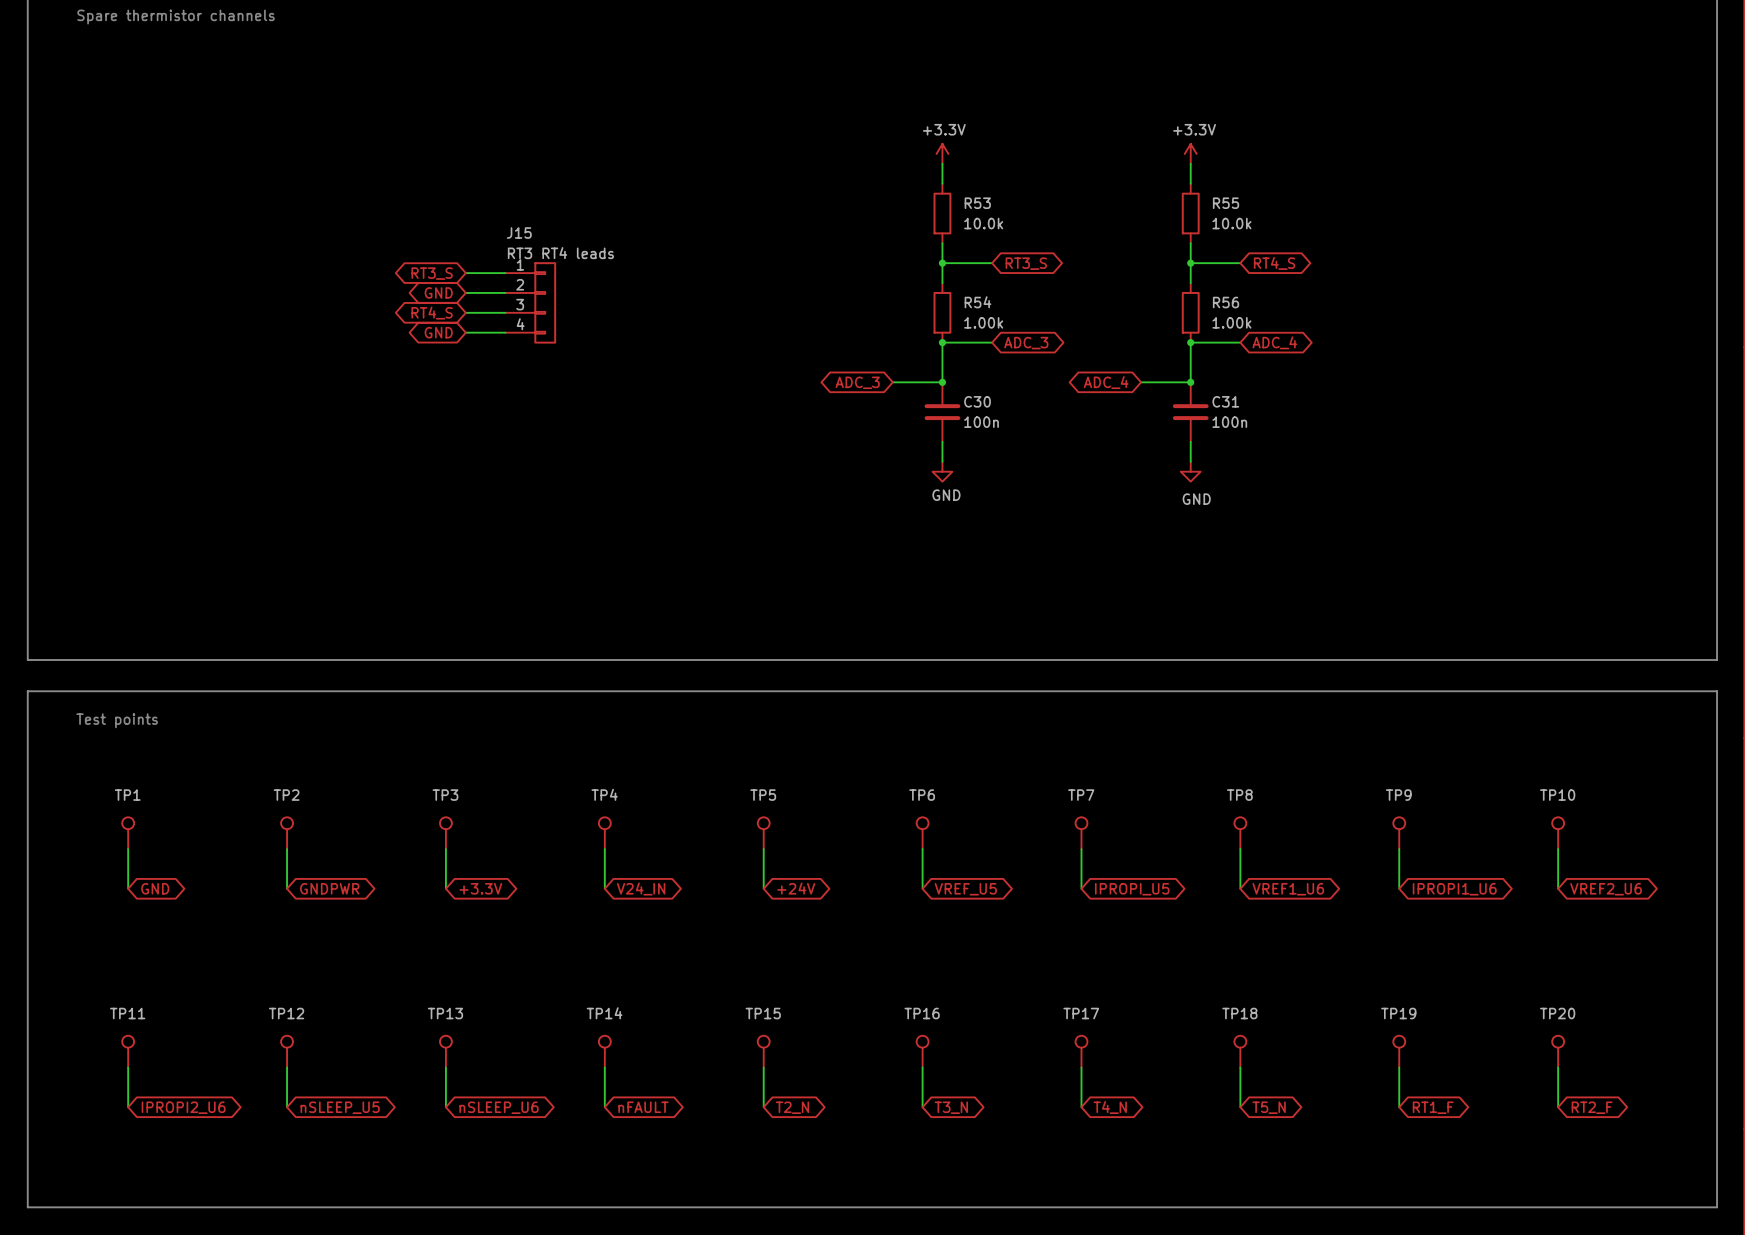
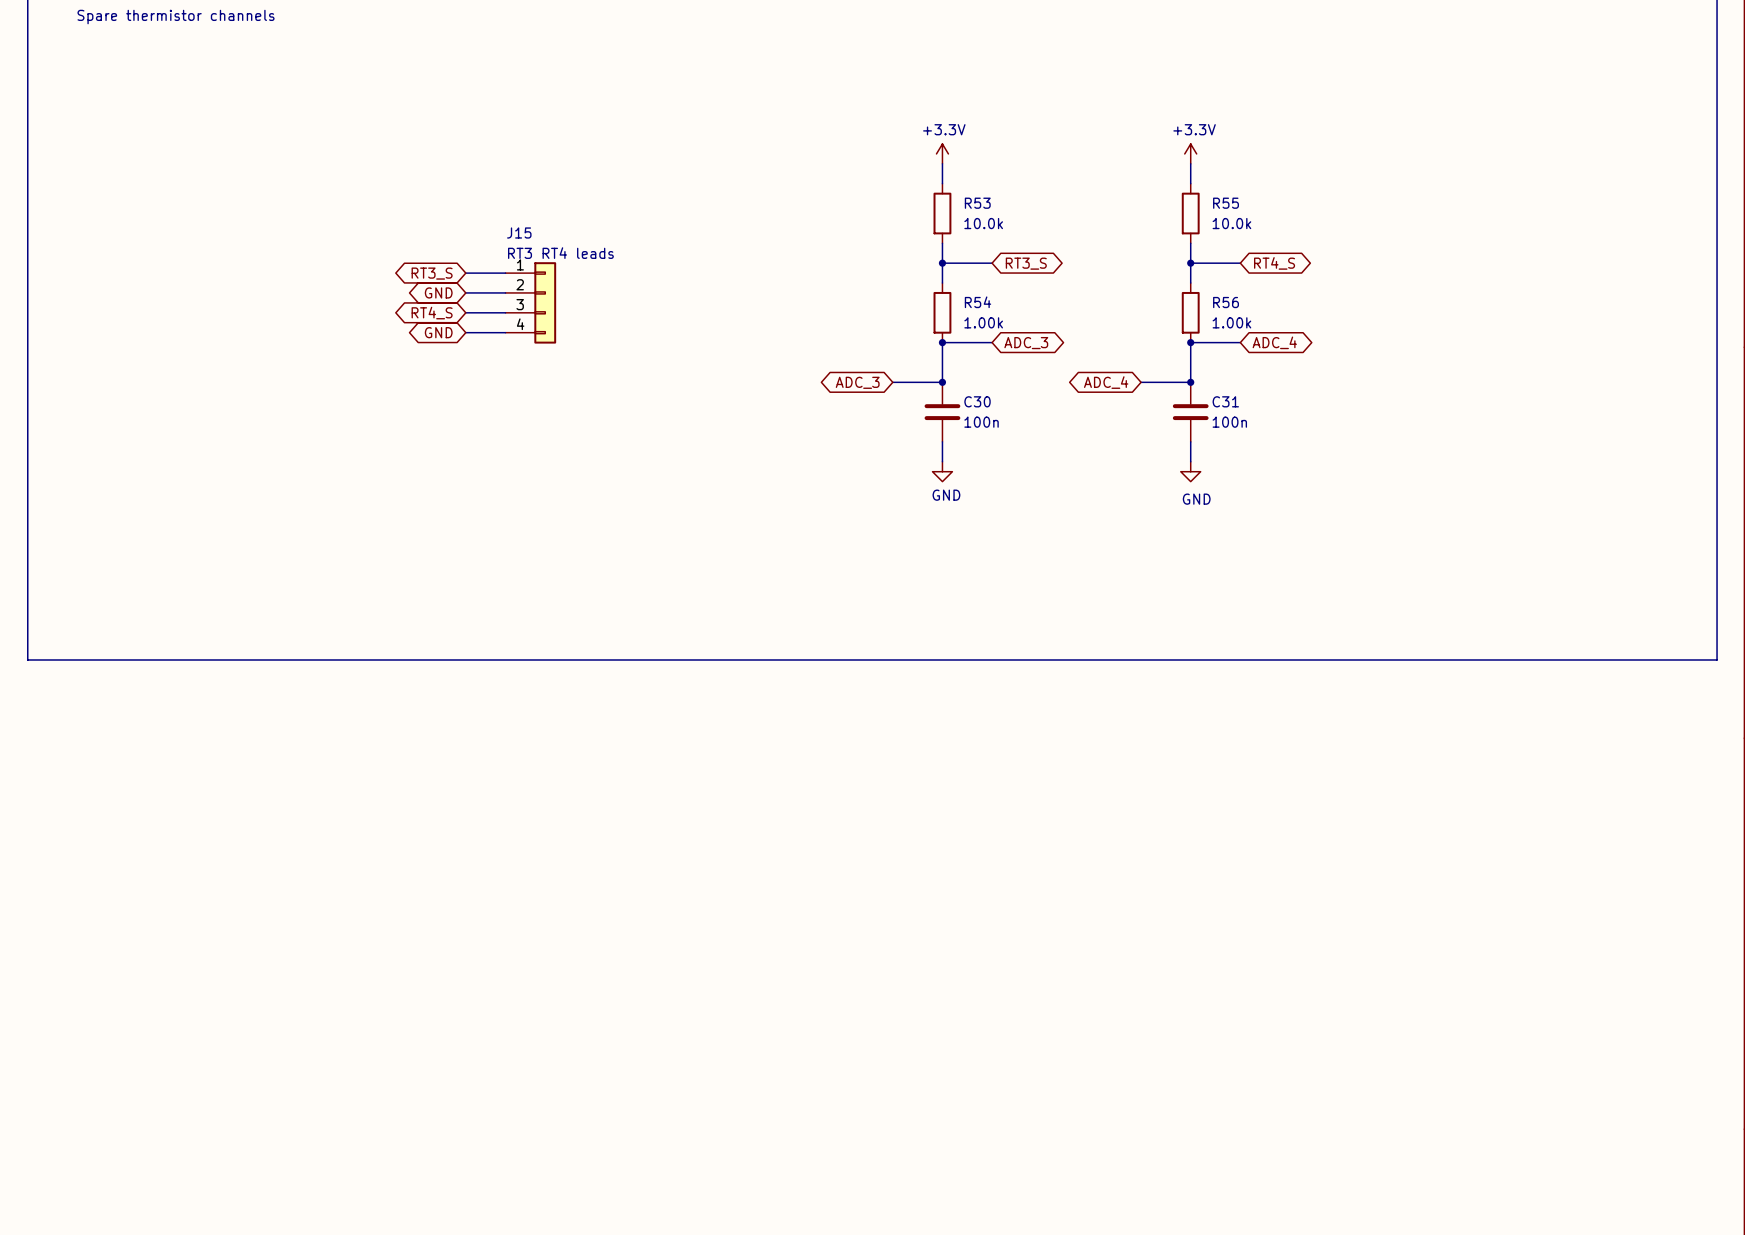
line: (27, 691) (1717, 691) (1717, 1207) (27, 1207) (27, 691) -> none
text: Test points (117, 720) -> none
TP1: (128, 833) -> none
TP2: (287, 833) -> none
TP3: (445, 833) -> none
TP4: (604, 833) -> none
TP5: (763, 833) -> none
TP6: (922, 833) -> none
TP7: (1081, 833) -> none
TP8: (1240, 833) -> none
TP9: (1399, 833) -> none
TP10: (1558, 833) -> none
wire: (128, 849) (128, 888) -> none
wire: (287, 849) (287, 888) -> none
wire: (445, 849) (445, 888) -> none
wire: (604, 849) (604, 888) -> none
wire: (763, 849) (763, 888) -> none
wire: (922, 849) (922, 888) -> none
wire: (1081, 849) (1081, 888) -> none
wire: (1240, 849) (1240, 888) -> none
wire: (1399, 849) (1399, 888) -> none
wire: (1558, 849) (1558, 888) -> none
global label: GND (155, 888) -> none
global label: GNDPWR (329, 888) -> none
global label: +3.3V (480, 888) -> none
global label: +24V (796, 888) -> none
global label: V24_IN (641, 889) -> none
global label: VREF_U5 (965, 889) -> none
global label: IPROPI_U5 (1132, 889) -> none
global label: VREF1_U6 (1288, 889) -> none
global label: IPROPI1_U6 (1454, 889) -> none
global label: VREF2_U6 (1606, 889) -> none
TP11: (128, 1051) -> none
TP12: (287, 1051) -> none
TP13: (445, 1051) -> none
TP14: (604, 1051) -> none
TP15: (763, 1051) -> none
TP16: (922, 1051) -> none
TP17: (1081, 1051) -> none
TP18: (1240, 1051) -> none
TP19: (1399, 1051) -> none
TP20: (1558, 1051) -> none
wire: (128, 1067) (128, 1107) -> none
wire: (287, 1067) (287, 1107) -> none
wire: (445, 1067) (445, 1107) -> none
wire: (604, 1067) (604, 1107) -> none
wire: (763, 1067) (763, 1107) -> none
wire: (922, 1067) (922, 1107) -> none
wire: (1081, 1067) (1081, 1107) -> none
wire: (1240, 1067) (1240, 1107) -> none
wire: (1399, 1067) (1399, 1107) -> none
wire: (1558, 1067) (1558, 1107) -> none
global label: IPROPI2_U6 (183, 1107) -> none
global label: nSLEEP_U5 (340, 1107) -> none
global label: nSLEEP_U6 (499, 1107) -> none
global label: nFAULT (643, 1107) -> none
global label: T2_N (792, 1107) -> none
global label: T3_N (951, 1107) -> none
global label: T4_N (1110, 1107) -> none
global label: T5_N (1269, 1107) -> none
global label: RT1_F (1433, 1107) -> none
global label: RT2_F (1592, 1107) -> none

